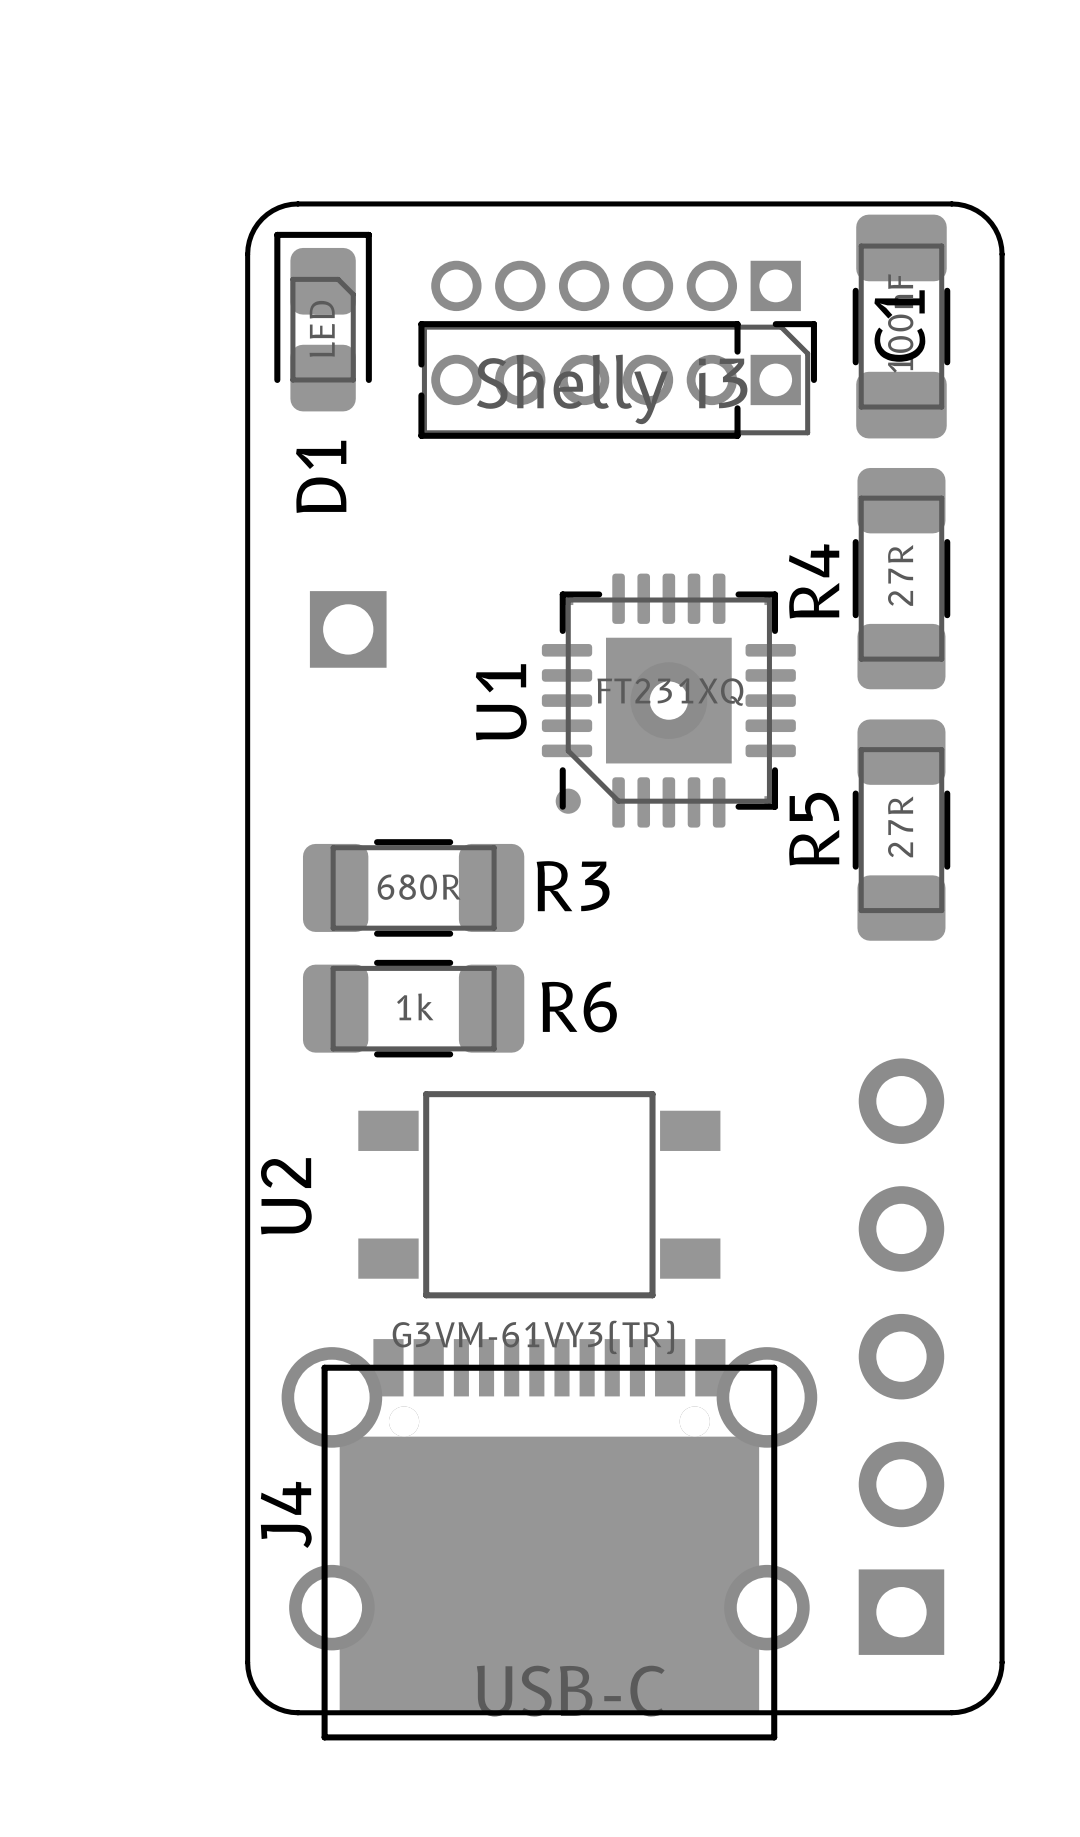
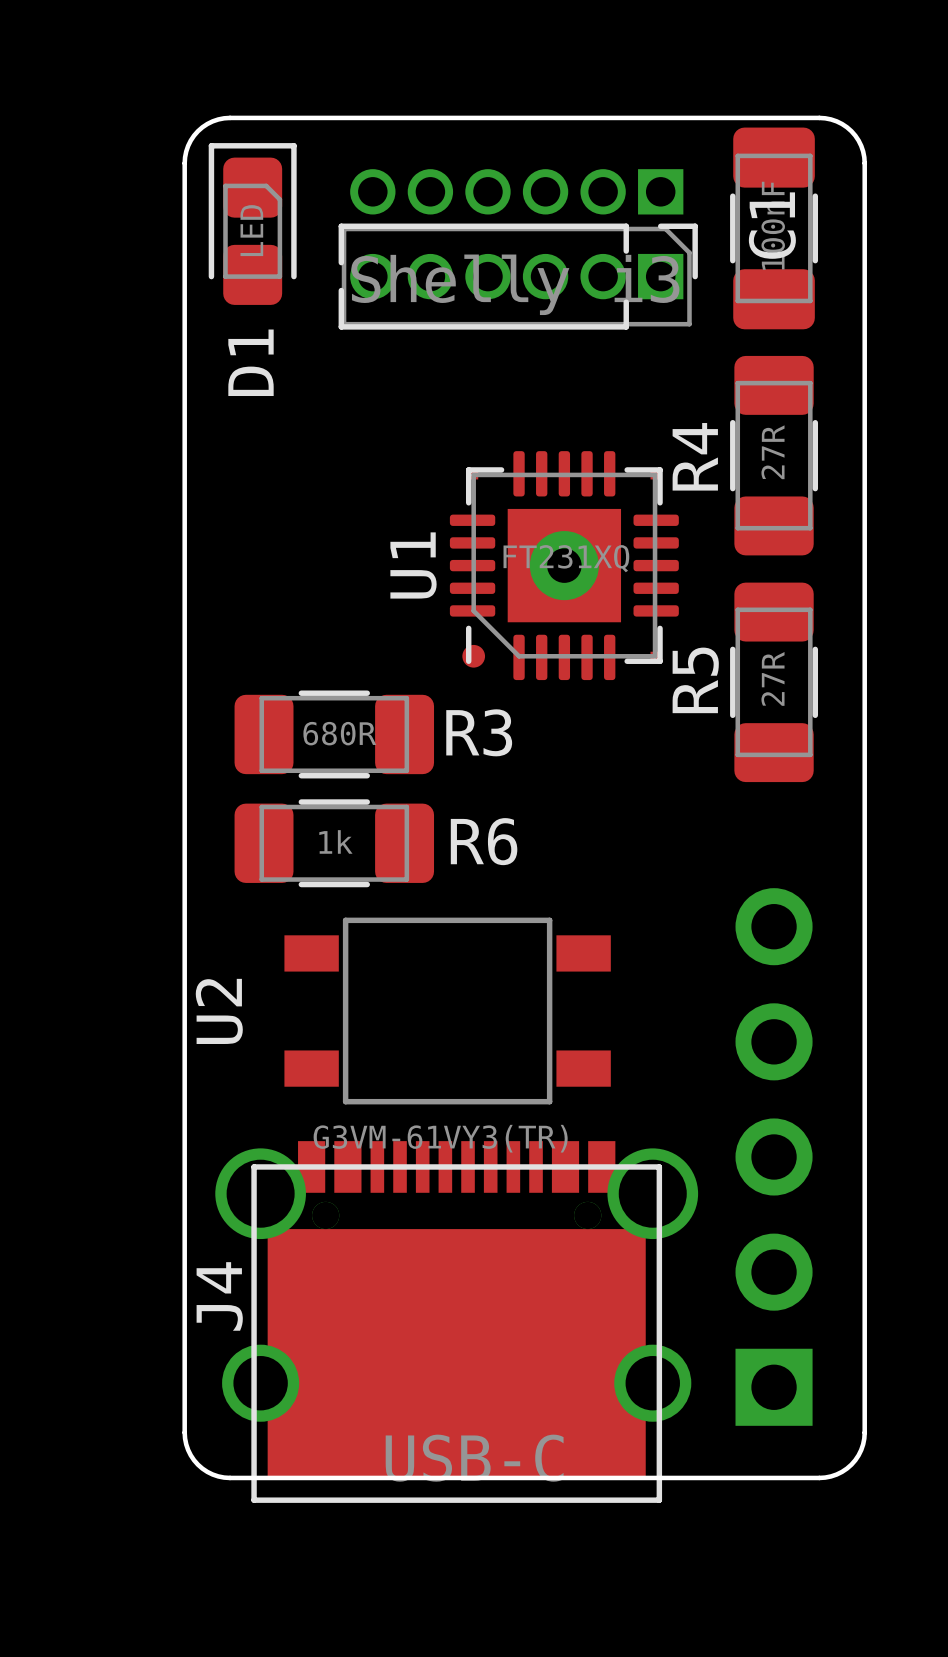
part: (348, 629) -> none

